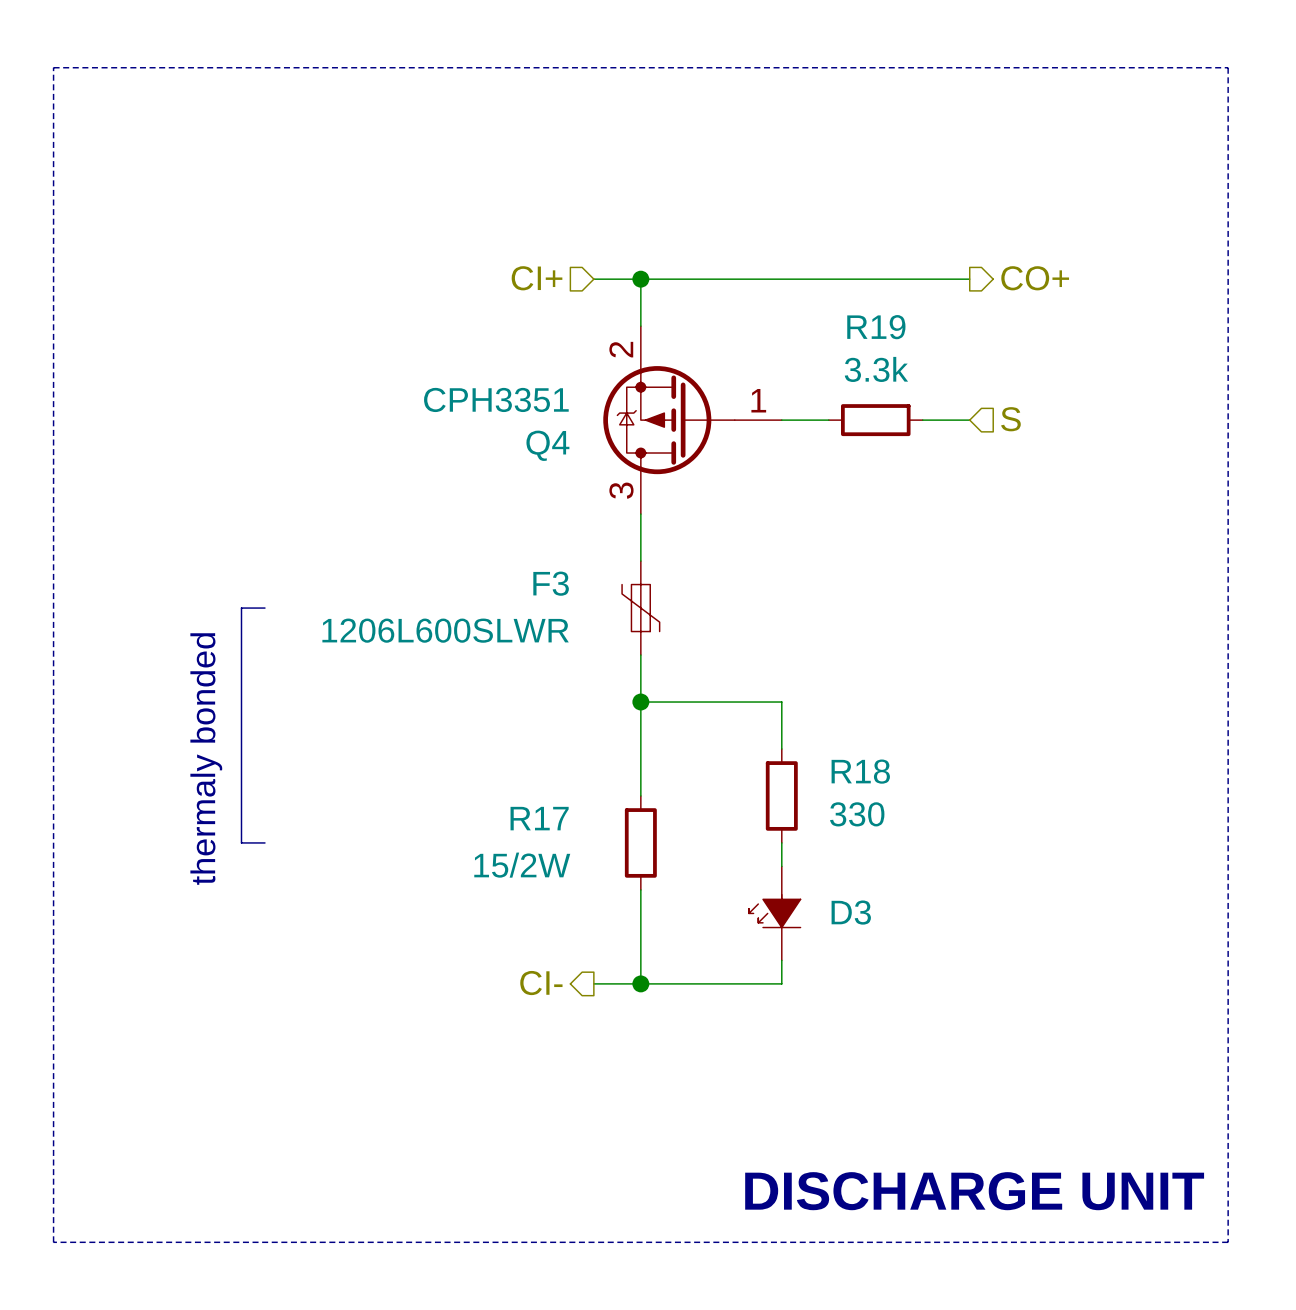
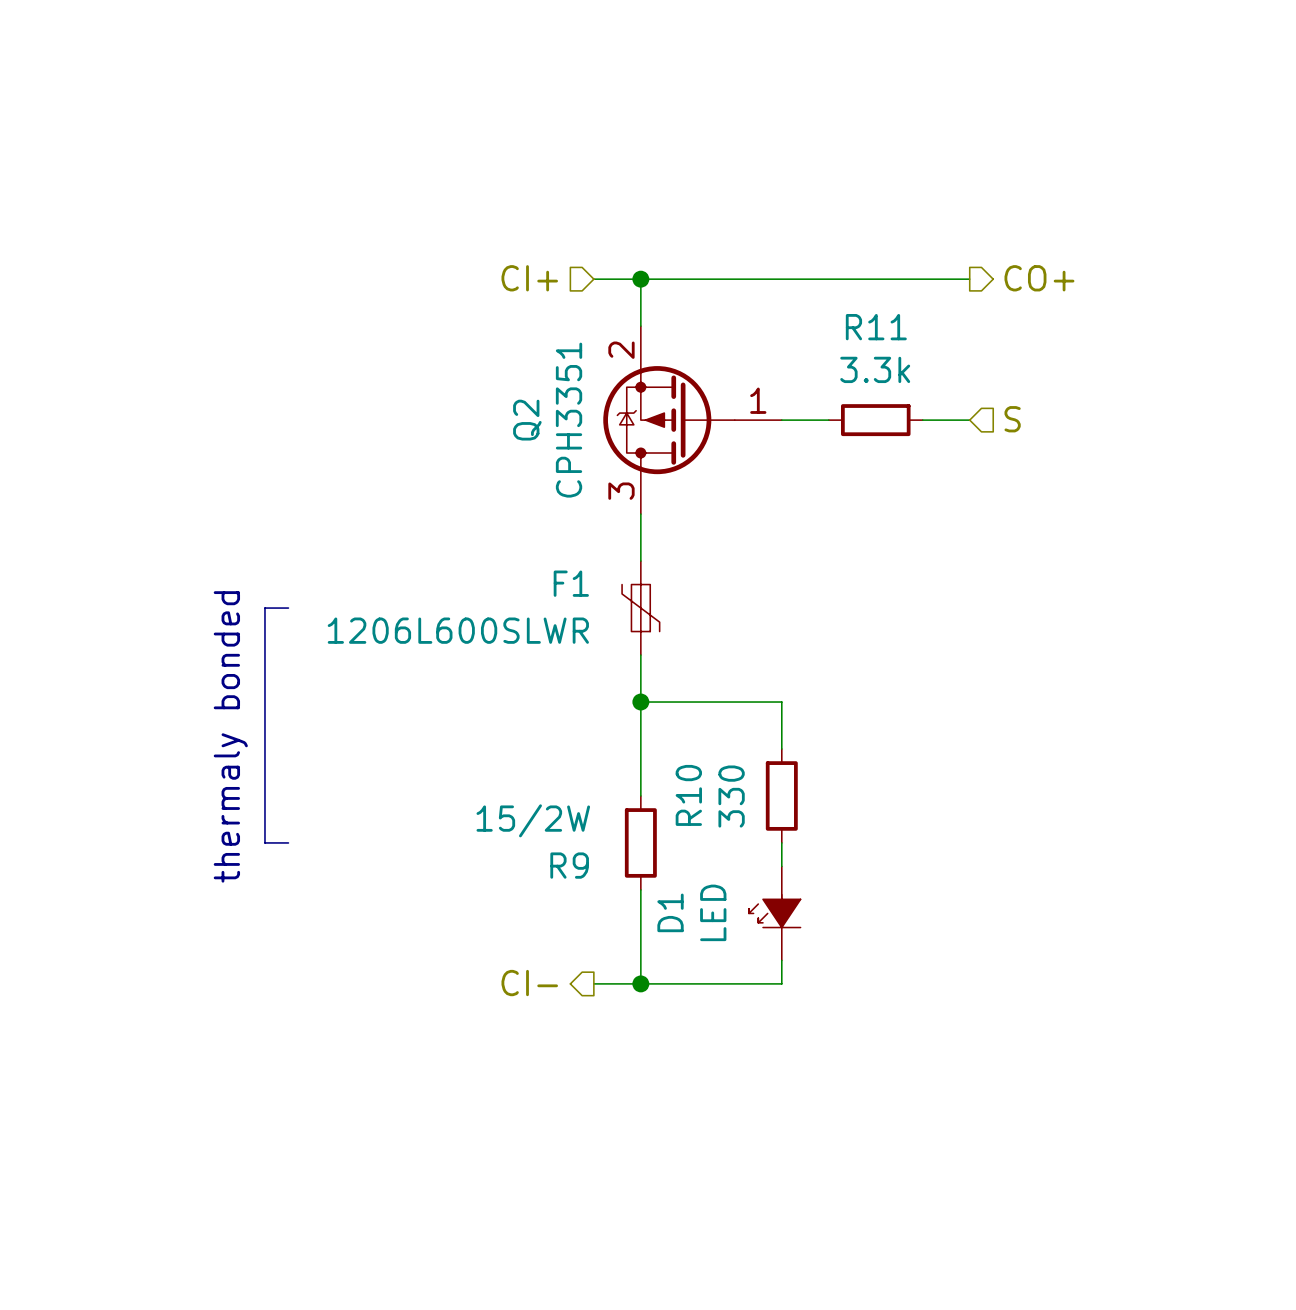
line: (53, 67) (1228, 67) (1228, 1242) (53, 1242) (53, 67) -> none
R19 name: R19 (876, 327) -> R11 (876, 327)
Q4 value rotation: 0° (496, 399) -> 90° counterclockwise (569, 420)
Q4 name: Q4 (547, 445) -> Q2 (527, 420)
F3 name: F3 (551, 583) -> F1 (571, 583)
line: (264, 608) (241, 608) (241, 842) (264, 842) -> (288, 608) (264, 608) (264, 842) (288, 842)
F3 value position: 1206L600SLWR (445, 630) -> 1206L600SLWR (458, 630)
text position: thermaly bonded (206, 758) -> thermaly bonded (230, 736)
R18 name: R18 (860, 771) -> R10 (688, 795)
R18 value rotation: 0° (857, 814) -> 90° counterclockwise (731, 796)
R18 value position: 330 (857, 814) -> 330 (731, 796)
R17 name: R17 (539, 818) -> R9 (569, 865)
R17 value position: 15/2W (522, 865) -> 15/2W (533, 820)
D3 value: none -> LED (713, 912)
D3 name: D3 (851, 912) -> D1 (670, 912)
text: DISCHARGE UNIT (974, 1191) -> none

